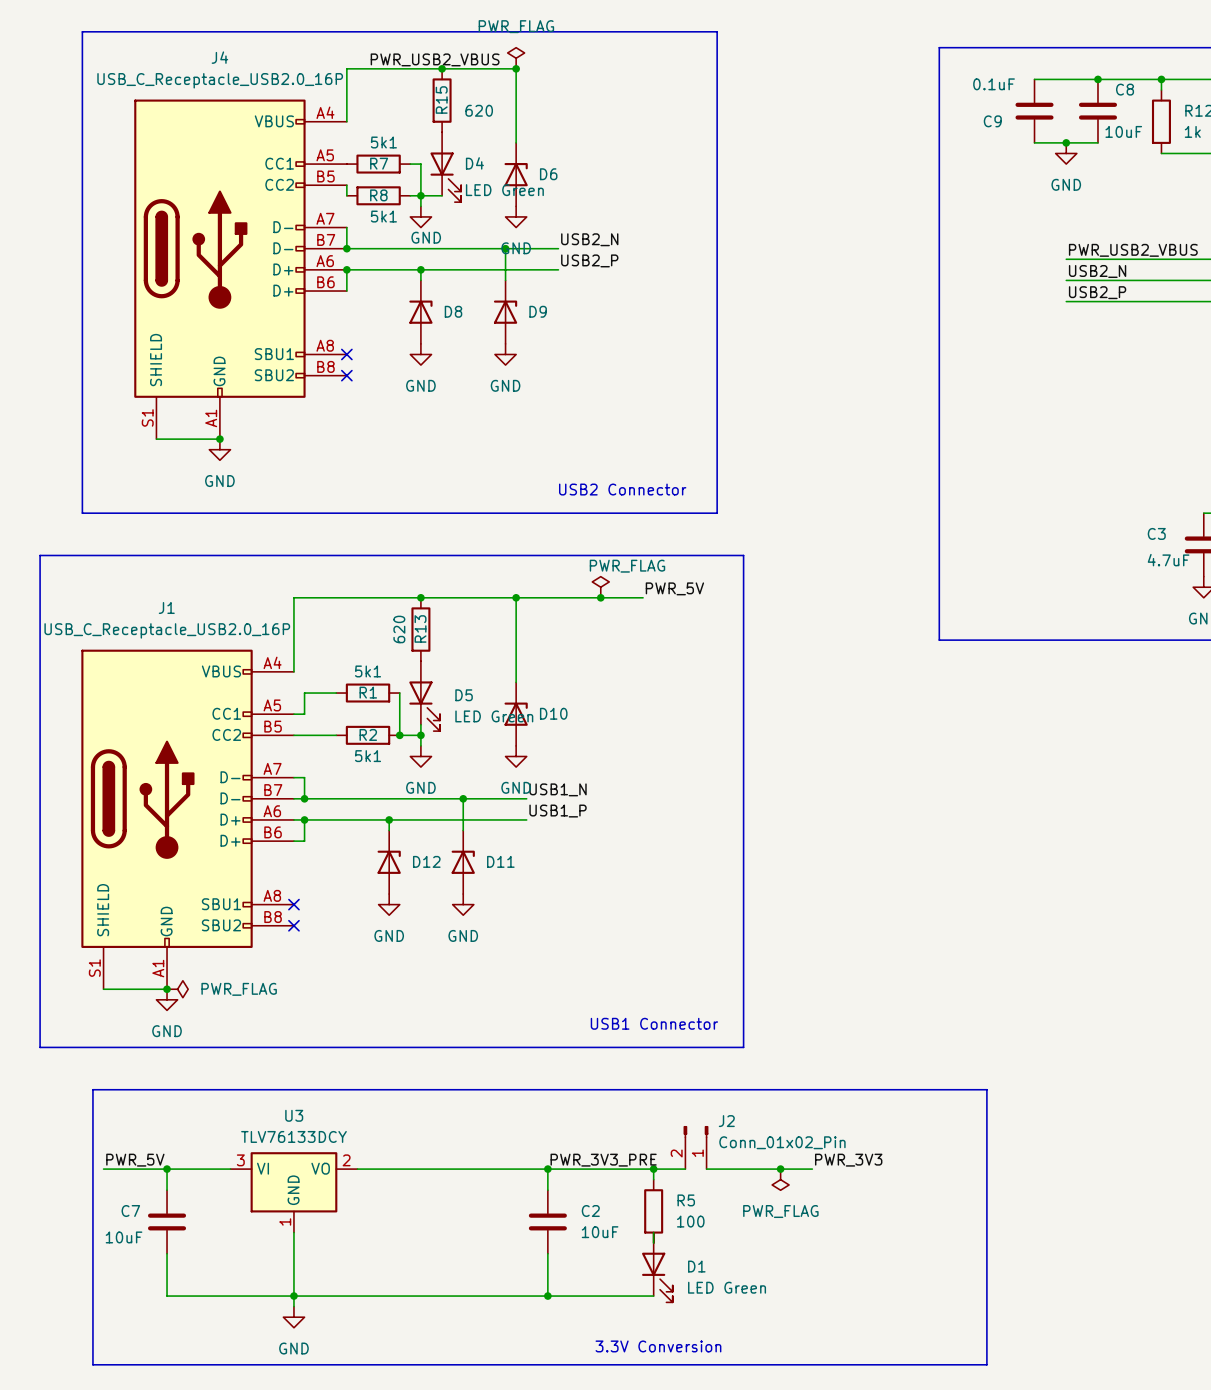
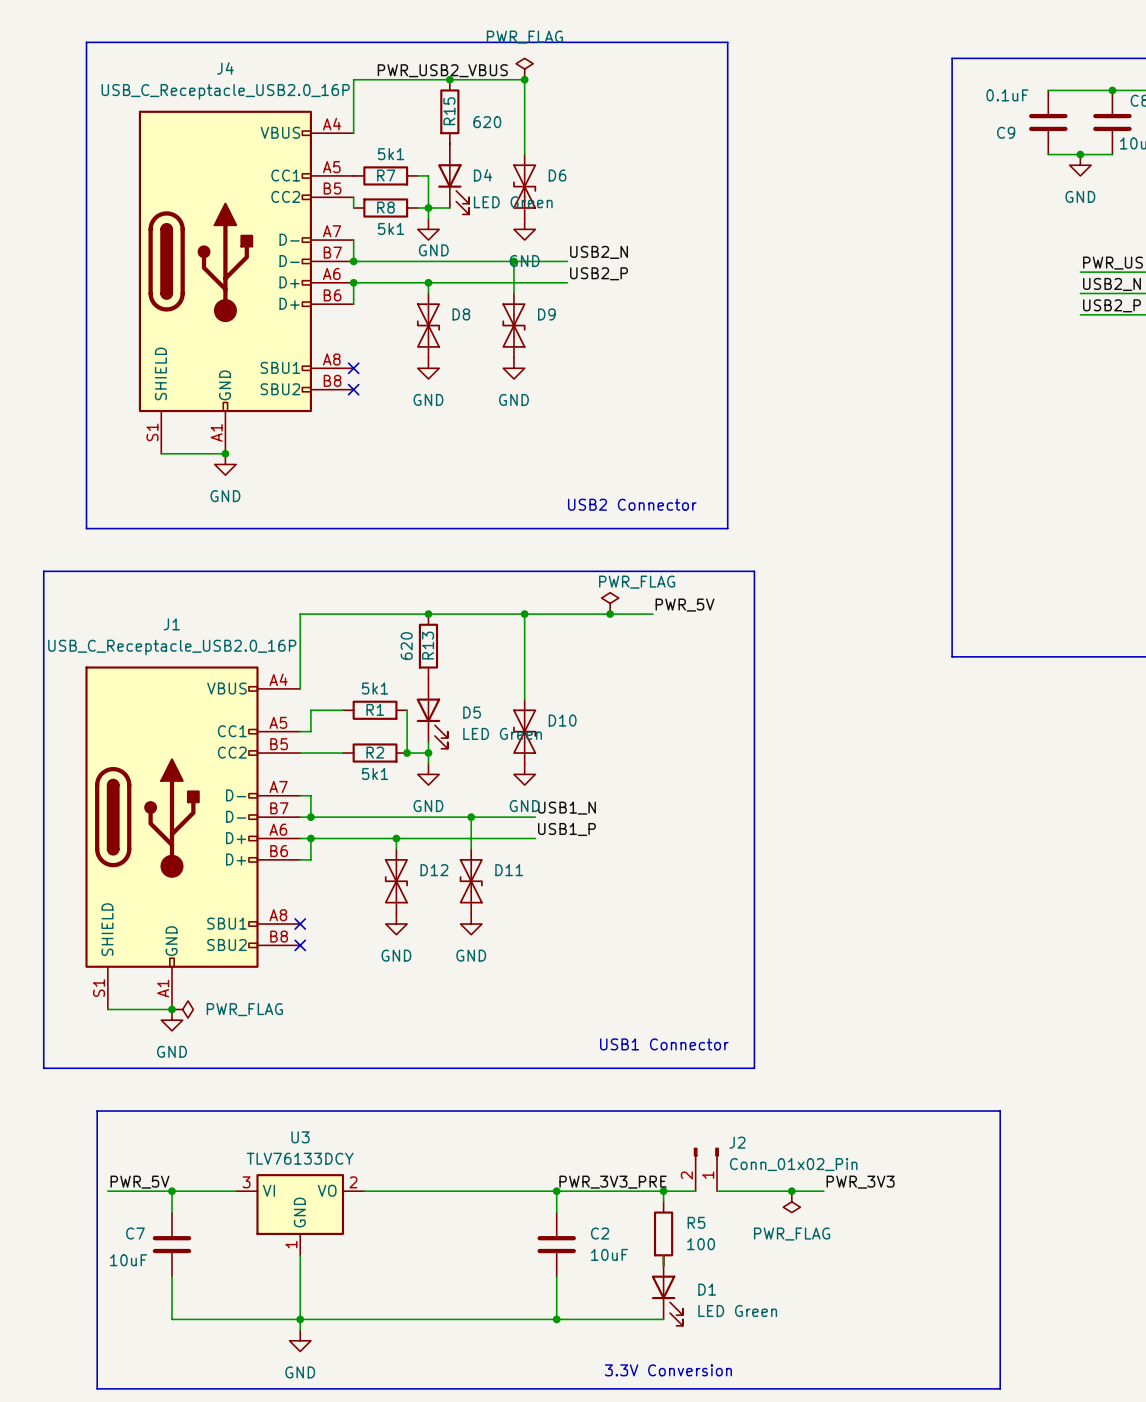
D6 symbol: [504, 142, 528, 207] -> [513, 154, 537, 219]
D8 symbol: [409, 280, 433, 344] -> [416, 293, 441, 358]
D9 symbol: [493, 280, 518, 344] -> [502, 293, 526, 358]
D10 symbol: [504, 682, 528, 746] -> [513, 699, 537, 764]
D12 symbol: [377, 830, 401, 895] -> [384, 849, 408, 914]
D11 symbol: [451, 830, 475, 895] -> [459, 849, 483, 914]

